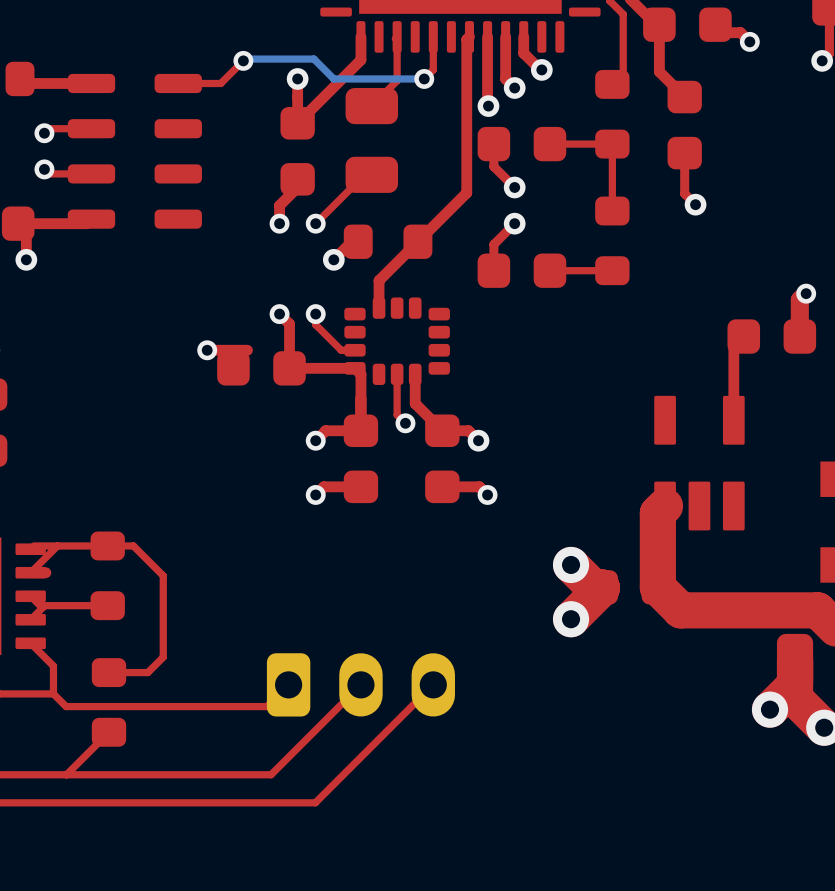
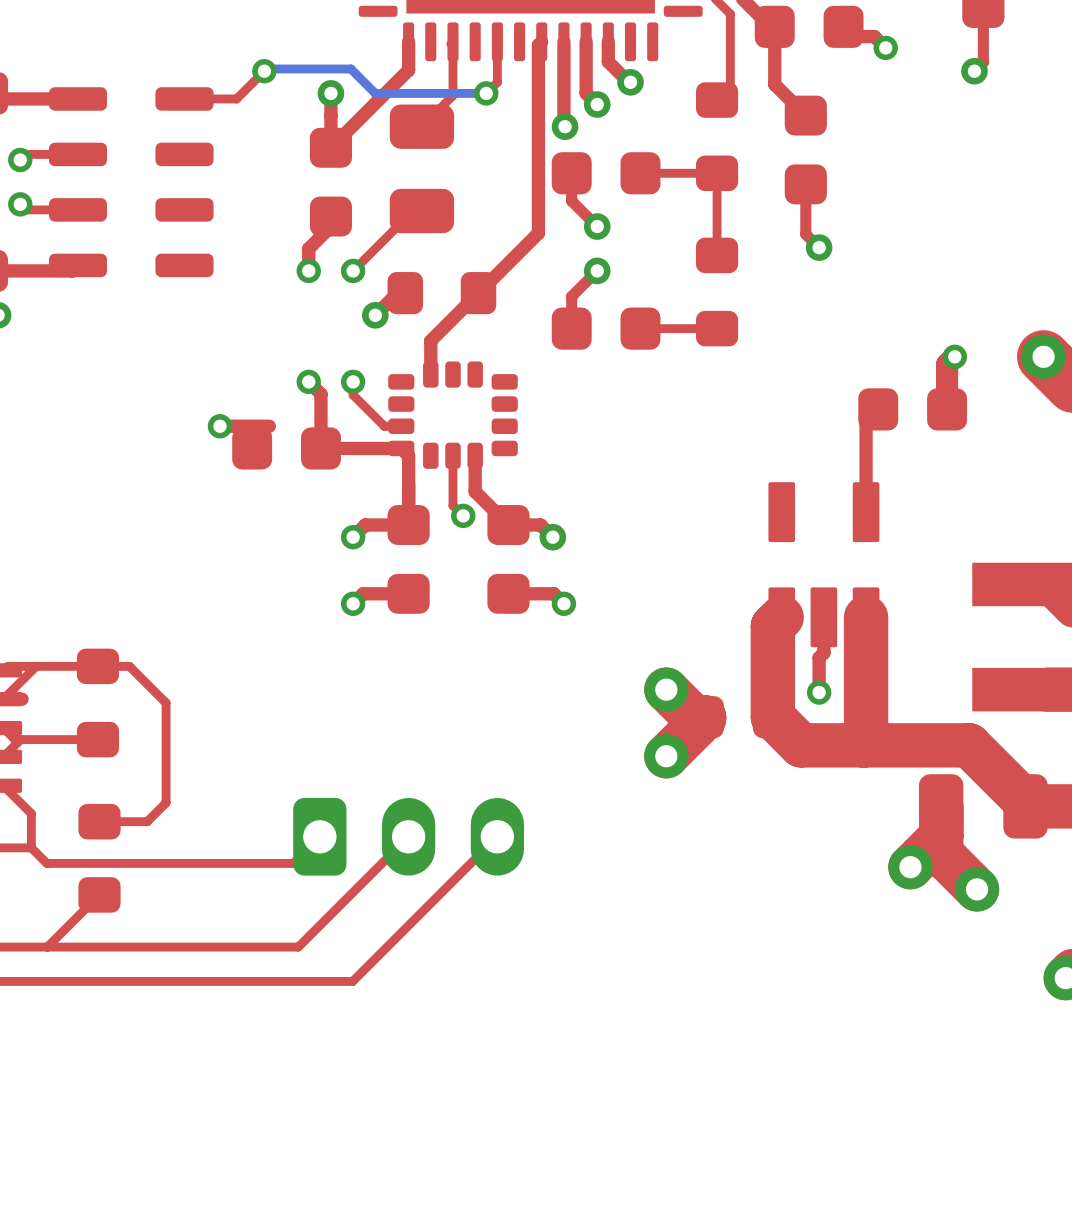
top track: none -> (823, 617) (823, 652) (819, 657) (819, 692)
top track: none -> (866, 617) (866, 742) (863, 745)
via: none -> (819, 692)

